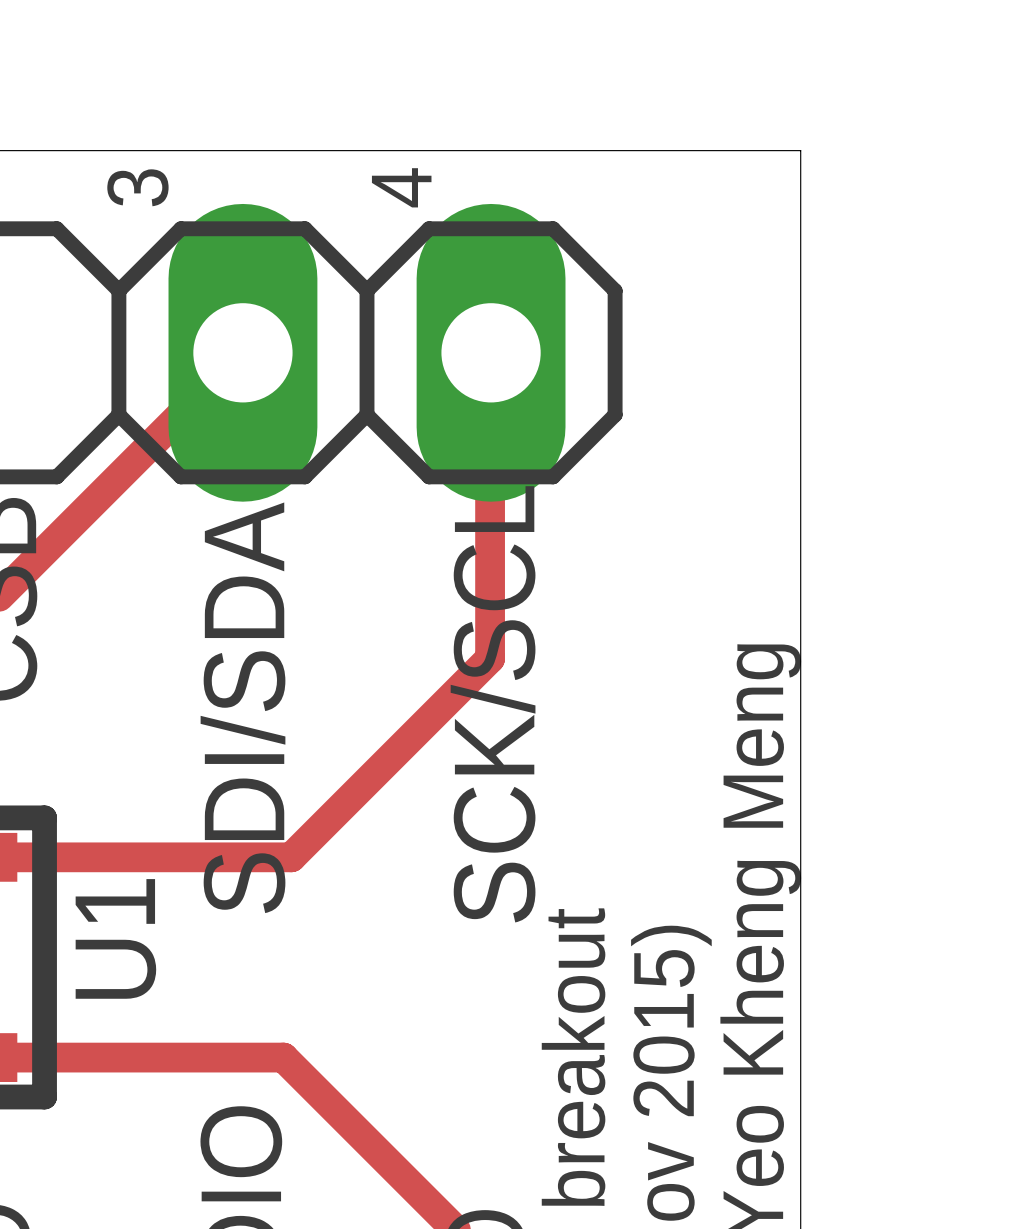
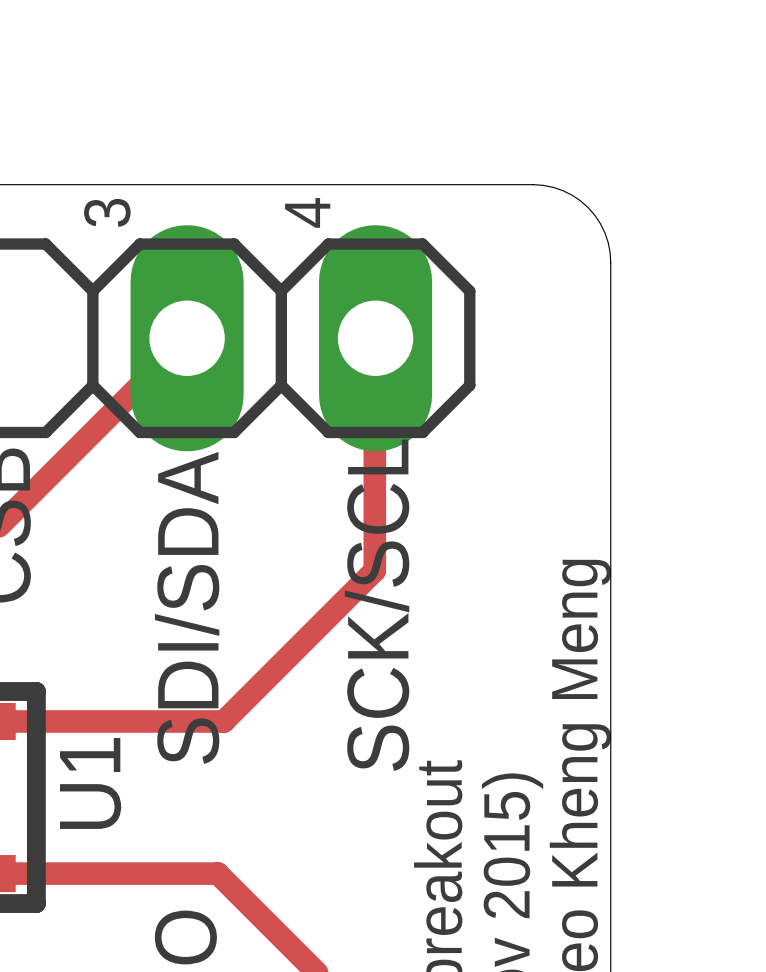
board edge: (698, 150) (800, 150) (800, 252) -> (533, 184) (562, 190) (587, 207) (604, 232) (610, 262)

